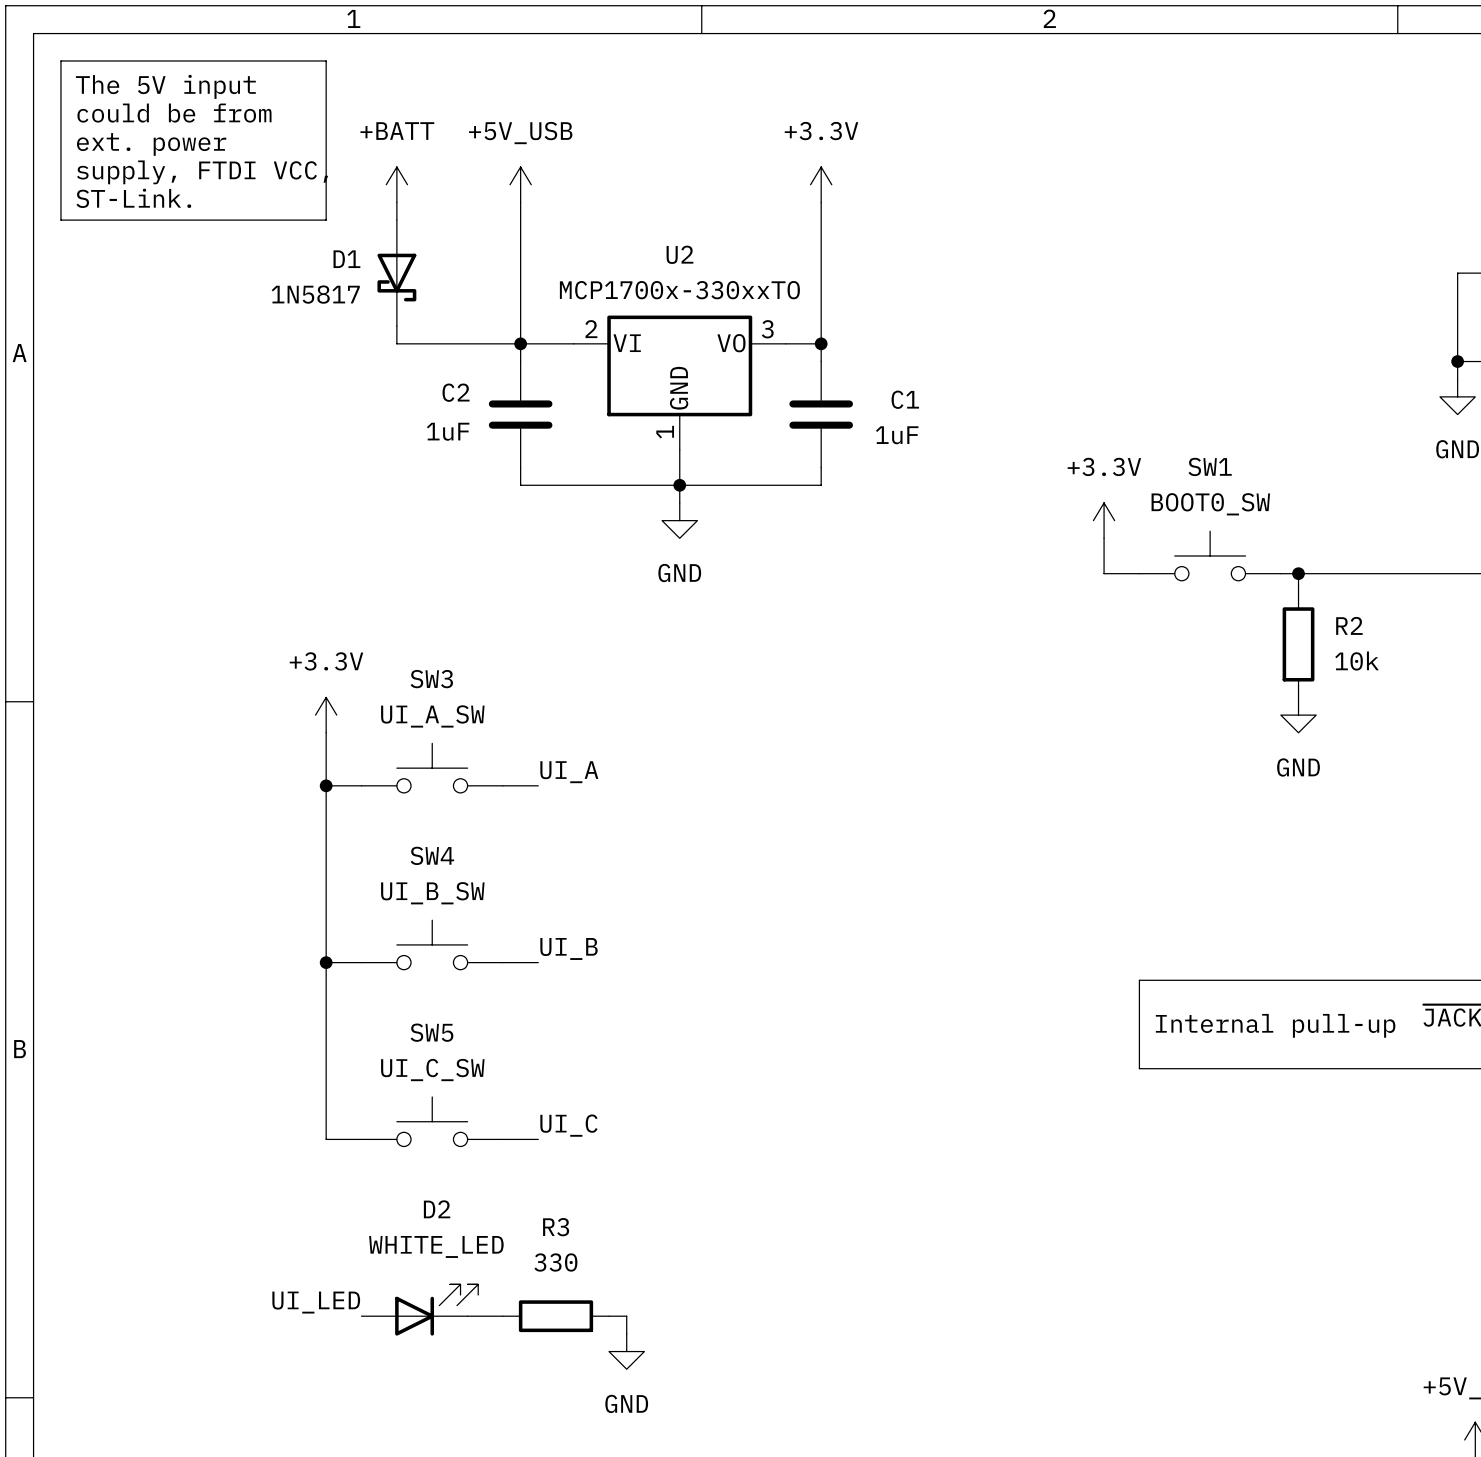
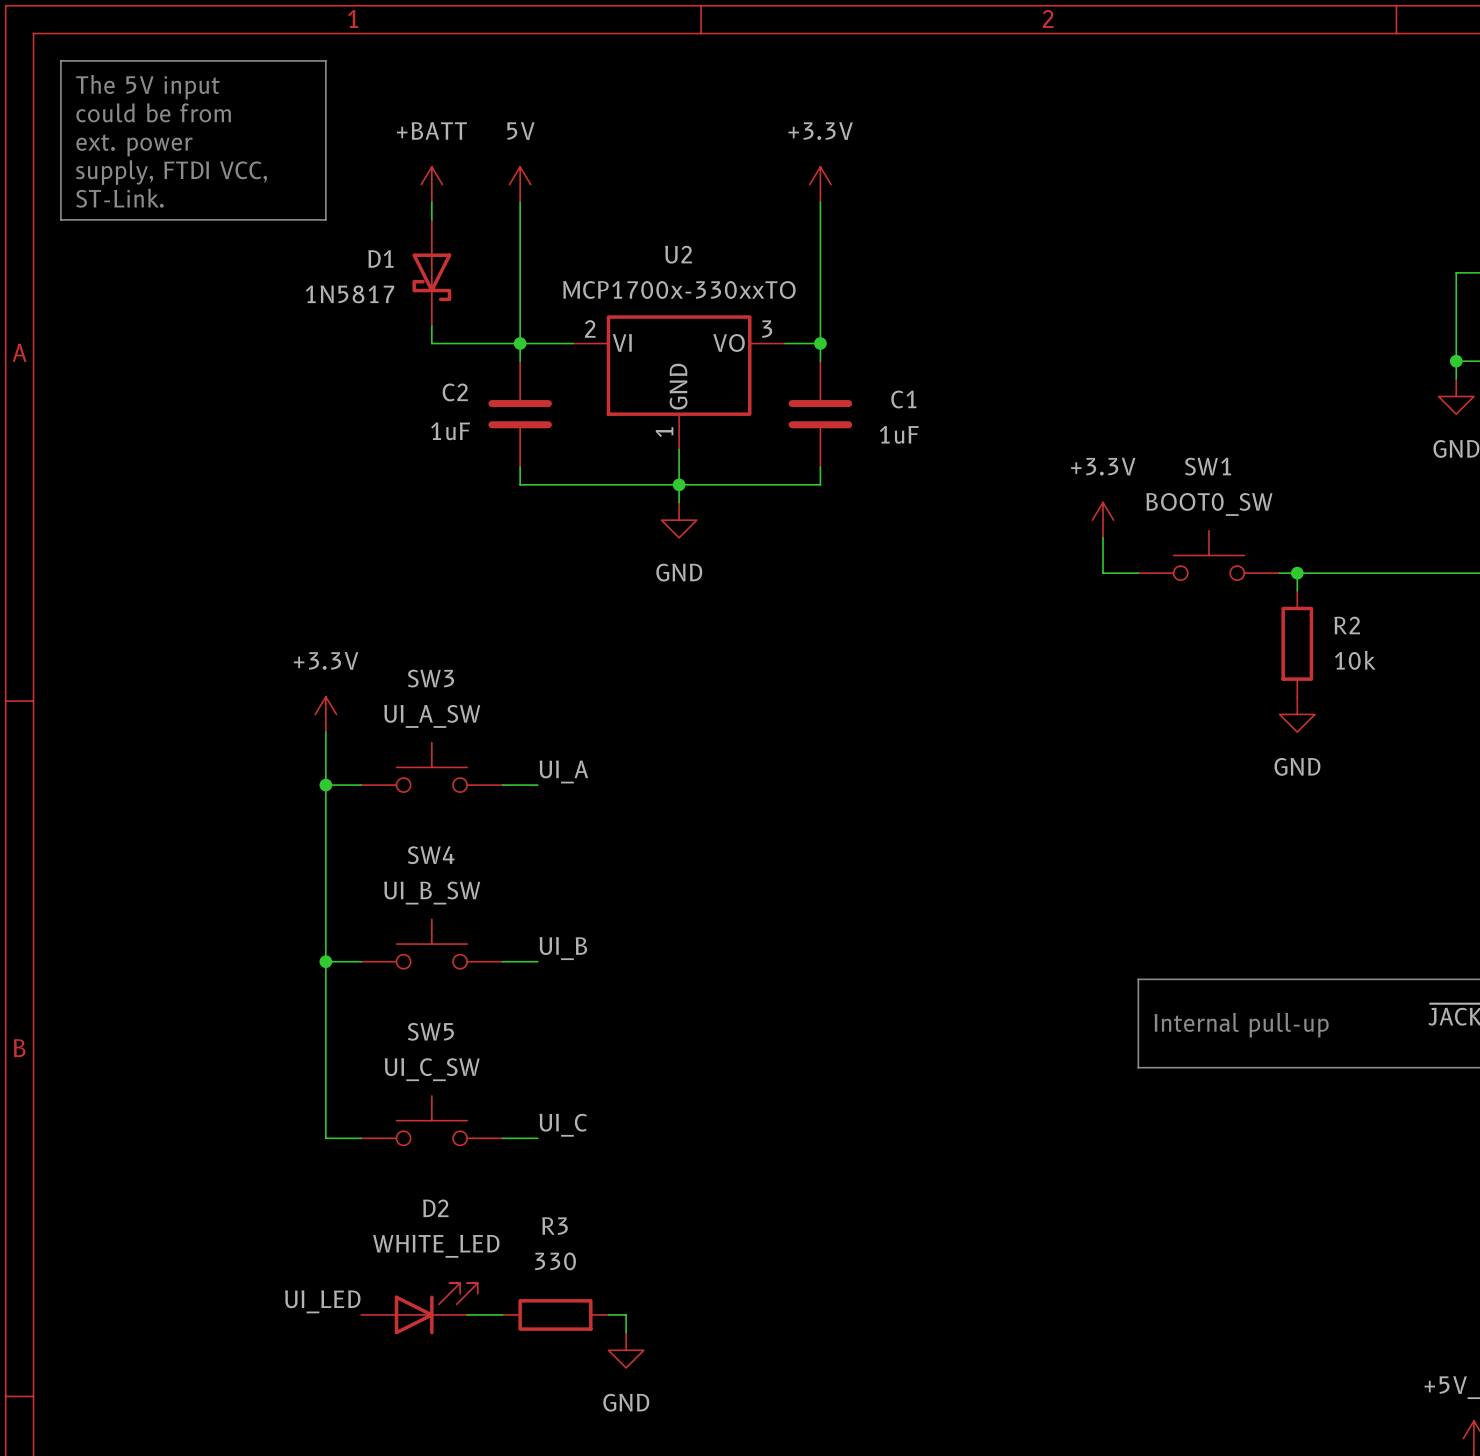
power symbol position: +BATT (396, 184) -> +BATT (431, 184)
power symbol: +5V_USB (520, 184) -> 5V (520, 184)
wire: (396, 202) (396, 220) -> (431, 202) (431, 219)
D1 position: (396, 273) -> (431, 272)
wire: (396, 326) (396, 343) (432, 343) -> (431, 325) (431, 343)

